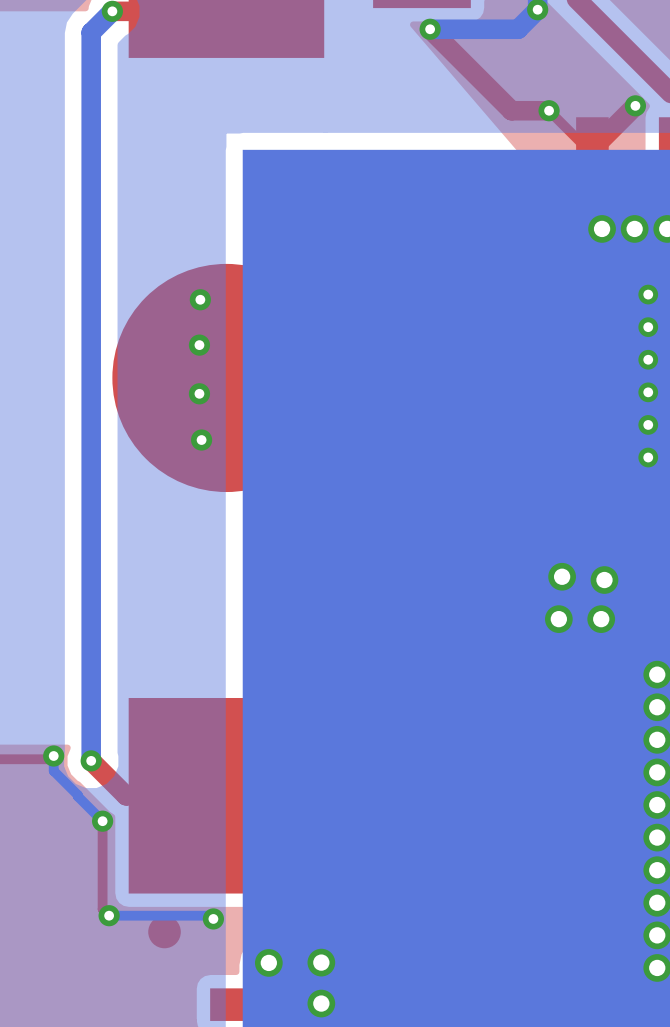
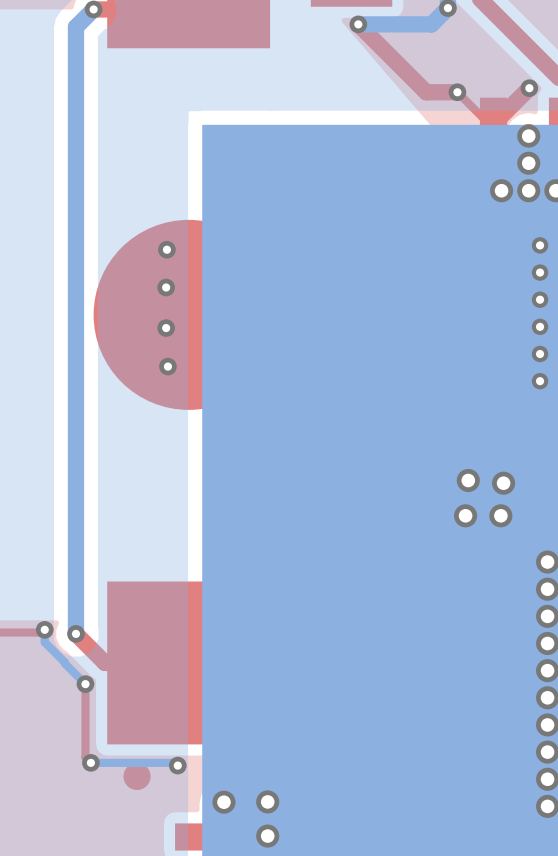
via: none -> (528, 136)
via: none -> (528, 163)

